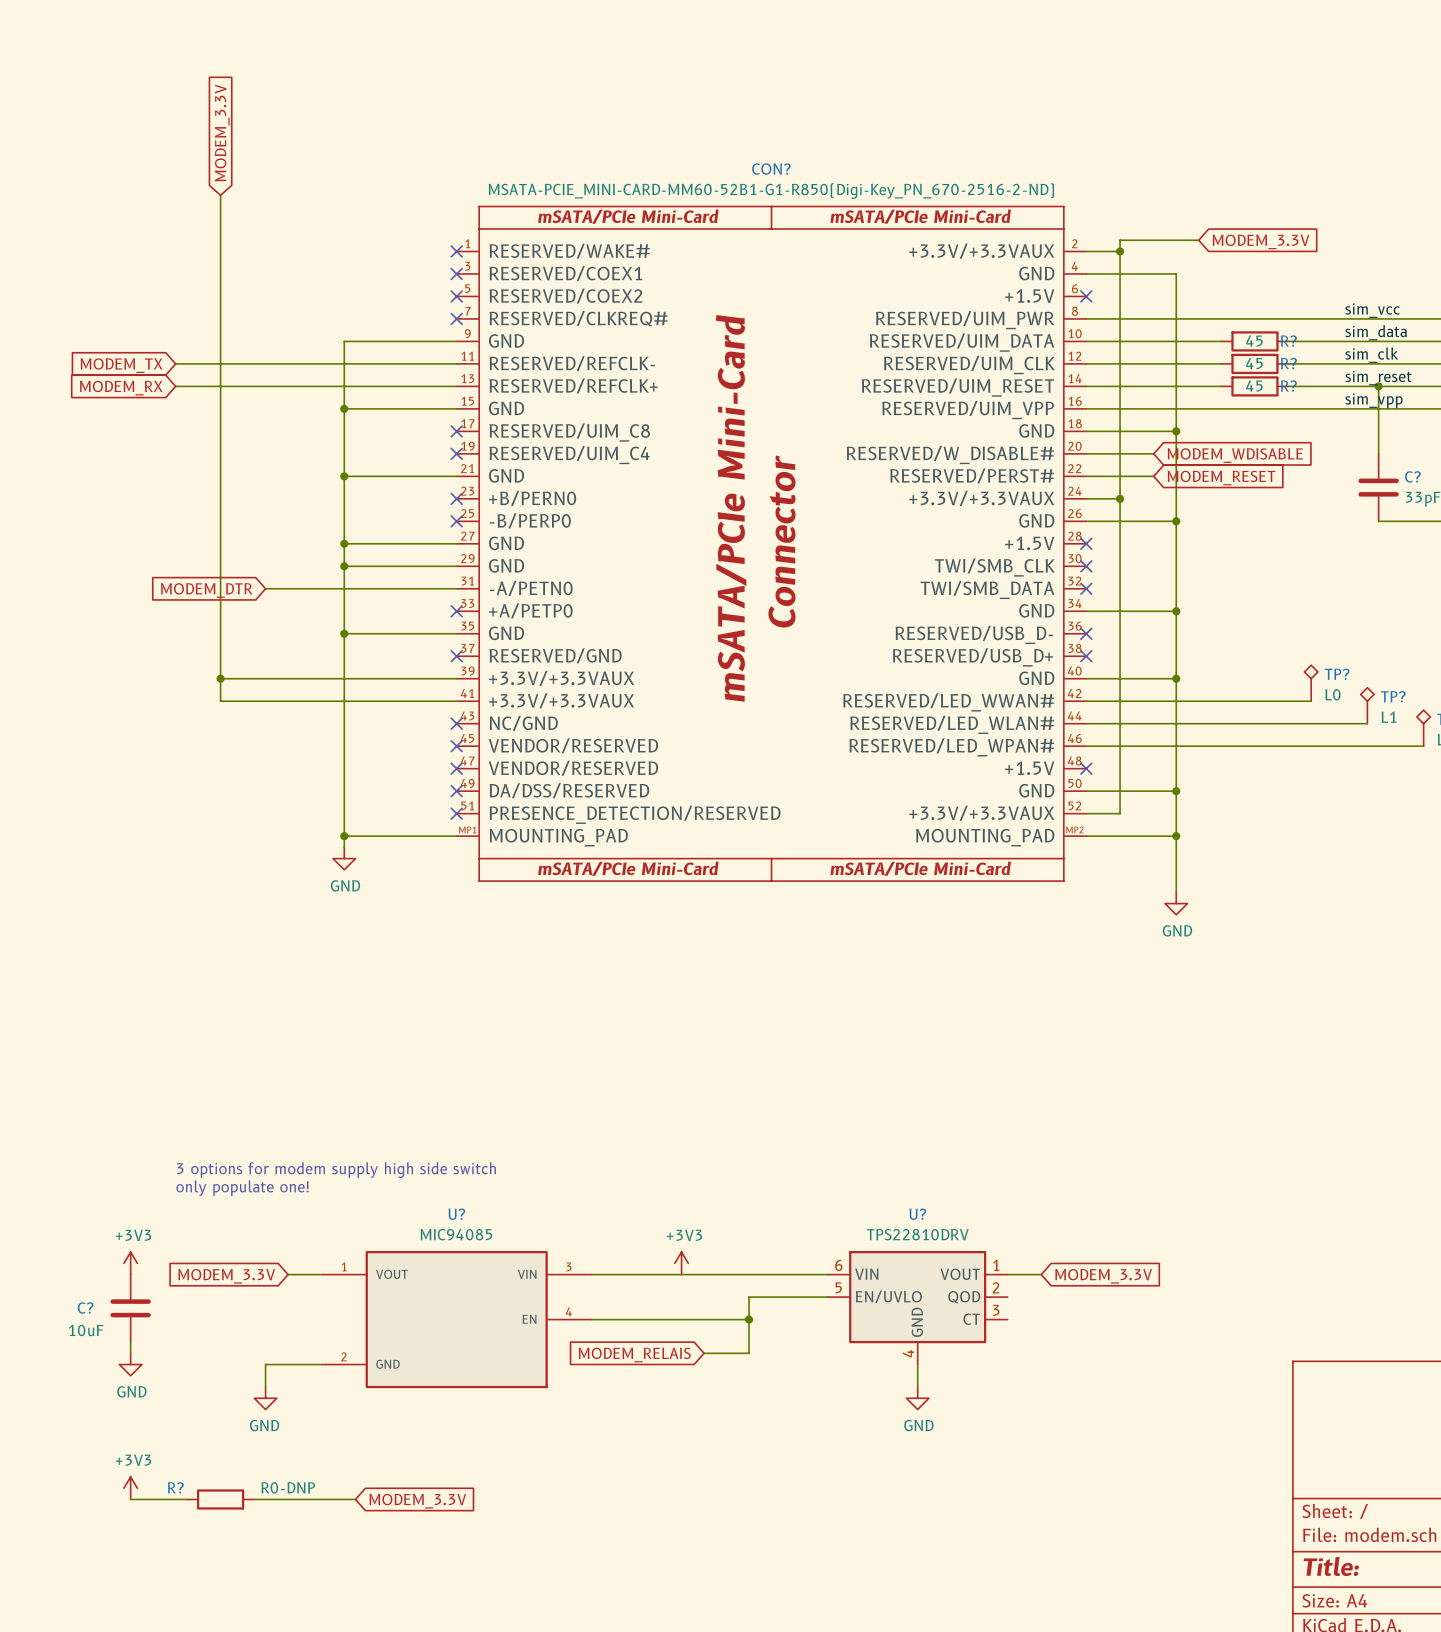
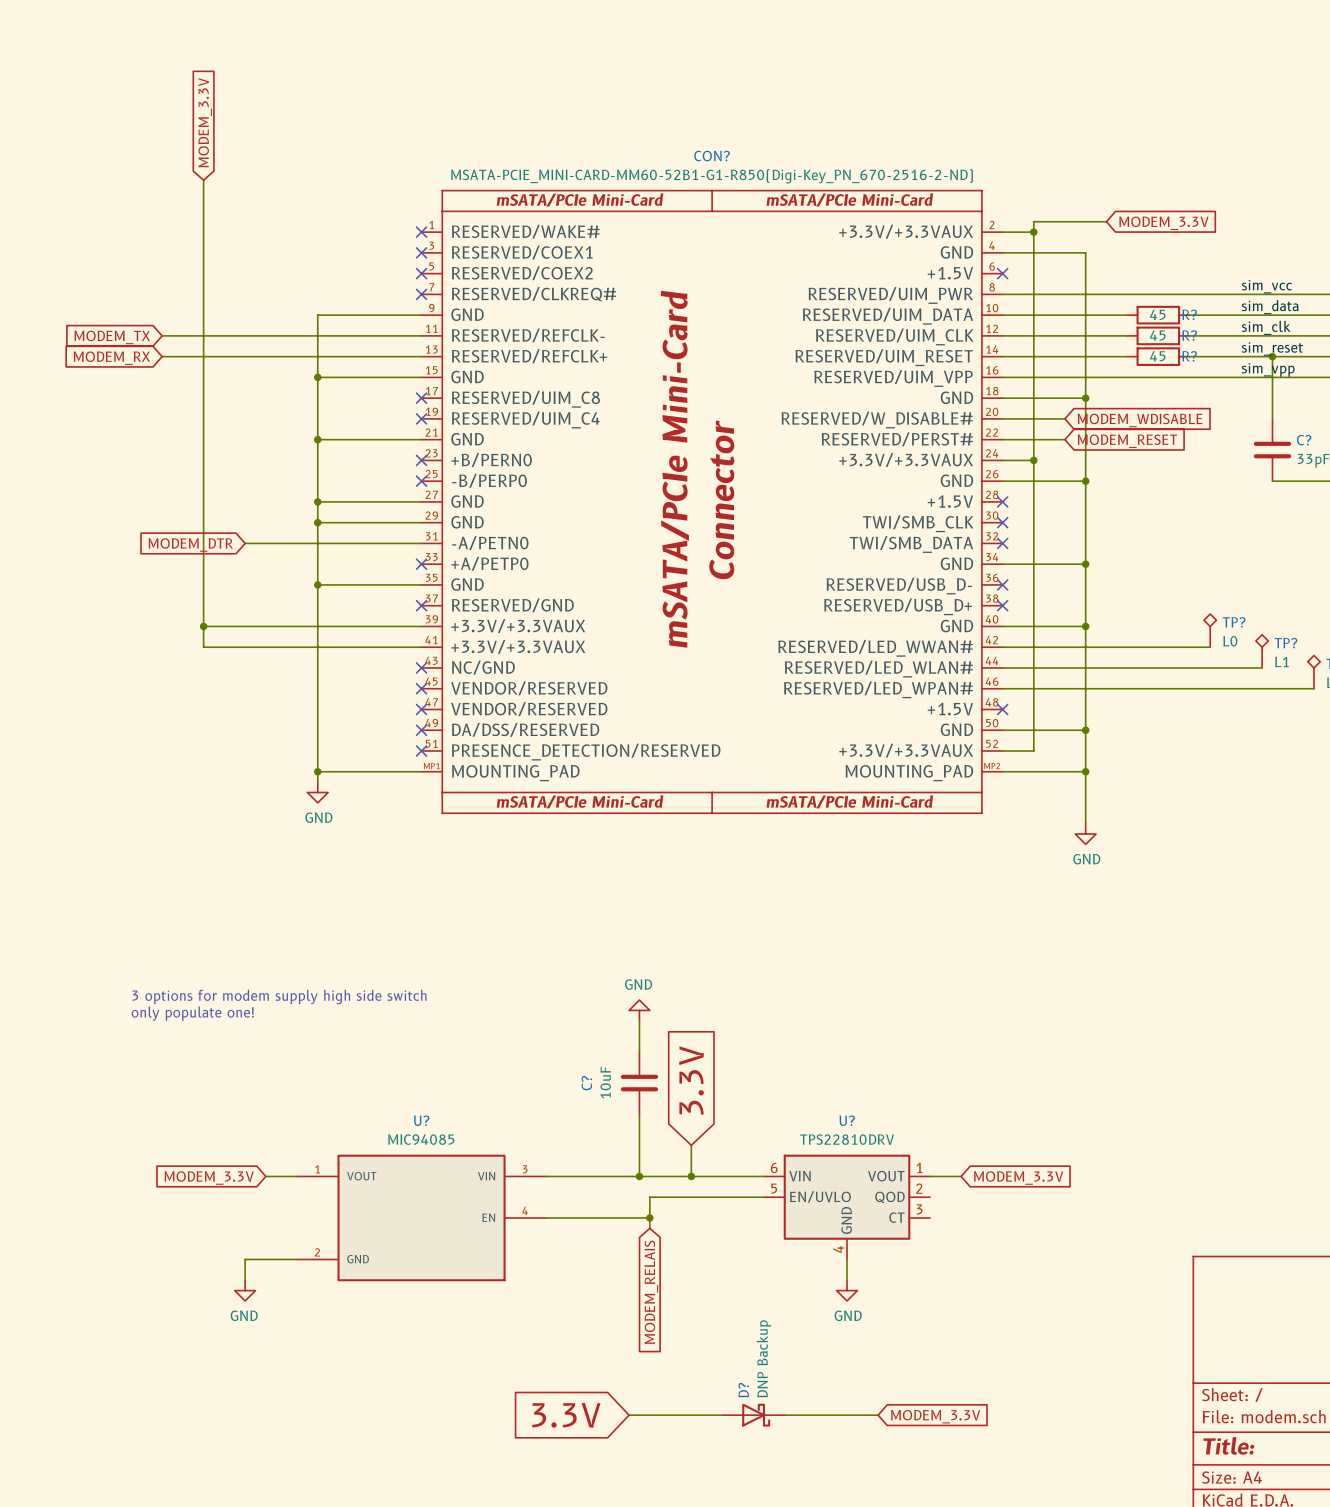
power symbol: none -> GND (639, 1010)
wire: none -> (639, 1020) (639, 1051)
text position: 3 options for modem supply high side switch (336, 1170) -> 3 options for modem supply high side switch (279, 997)
global label: none -> 3.3V (691, 1080)
C?: none -> 10uF (639, 1083)
text position: only populate one! (242, 1188) -> only populate one! (192, 1013)
wire: none -> (639, 1114) (639, 1176)
wire: none -> (691, 1145) (691, 1176)
power symbol: +3V3 (130, 1263) -> none
power symbol: +3V3 (681, 1263) -> none
junction: none -> (639, 1176)
junction: none -> (691, 1176)
wire: (749, 1297) (749, 1353) (704, 1353) -> (691, 1197) (649, 1197) (649, 1228)
C?: 10uF (130, 1308) -> none
wire: (704, 1319) (749, 1319) -> none
junction: none -> (649, 1217)
junction: (749, 1319) -> none
wire: (130, 1342) (130, 1353) -> none
global label rotation: 0° (634, 1354) -> 90° counterclockwise (651, 1292)
power symbol: GND (130, 1364) -> none
power symbol: +3V3 (130, 1488) -> none
wire: (130, 1499) (186, 1499) -> none
R?: R0-DNP (220, 1499) -> none
wire: (254, 1499) (355, 1499) -> none
global label: MODEM_3.3V (417, 1501) -> none
global label: none -> 3.3V (566, 1415)
wire: none -> (629, 1415) (722, 1415)
D?: none -> DNP Backup (753, 1415)
wire: none -> (784, 1415) (878, 1415)
global label: none -> MODEM_3.3V (935, 1416)

